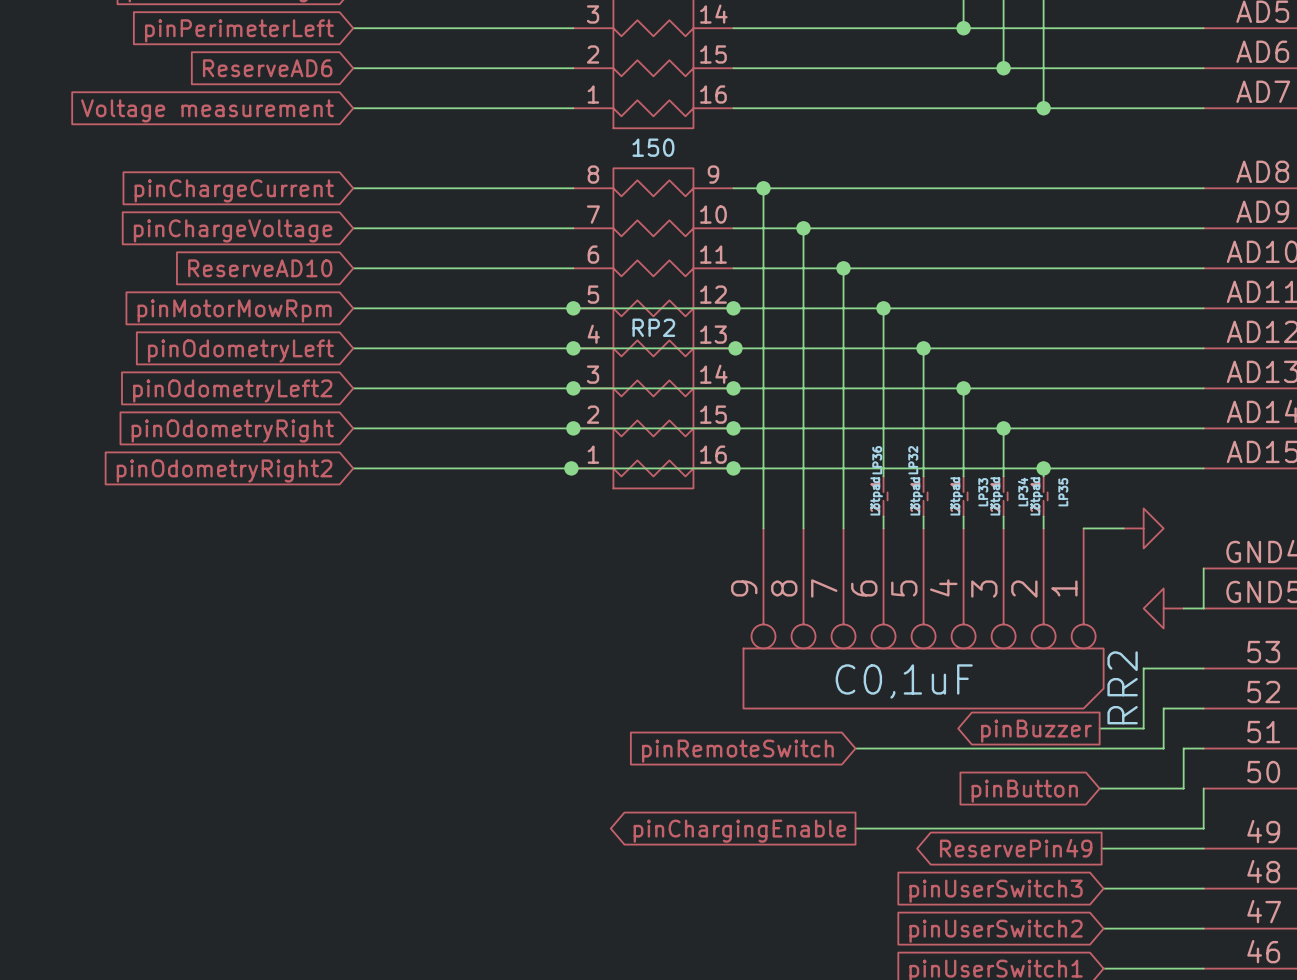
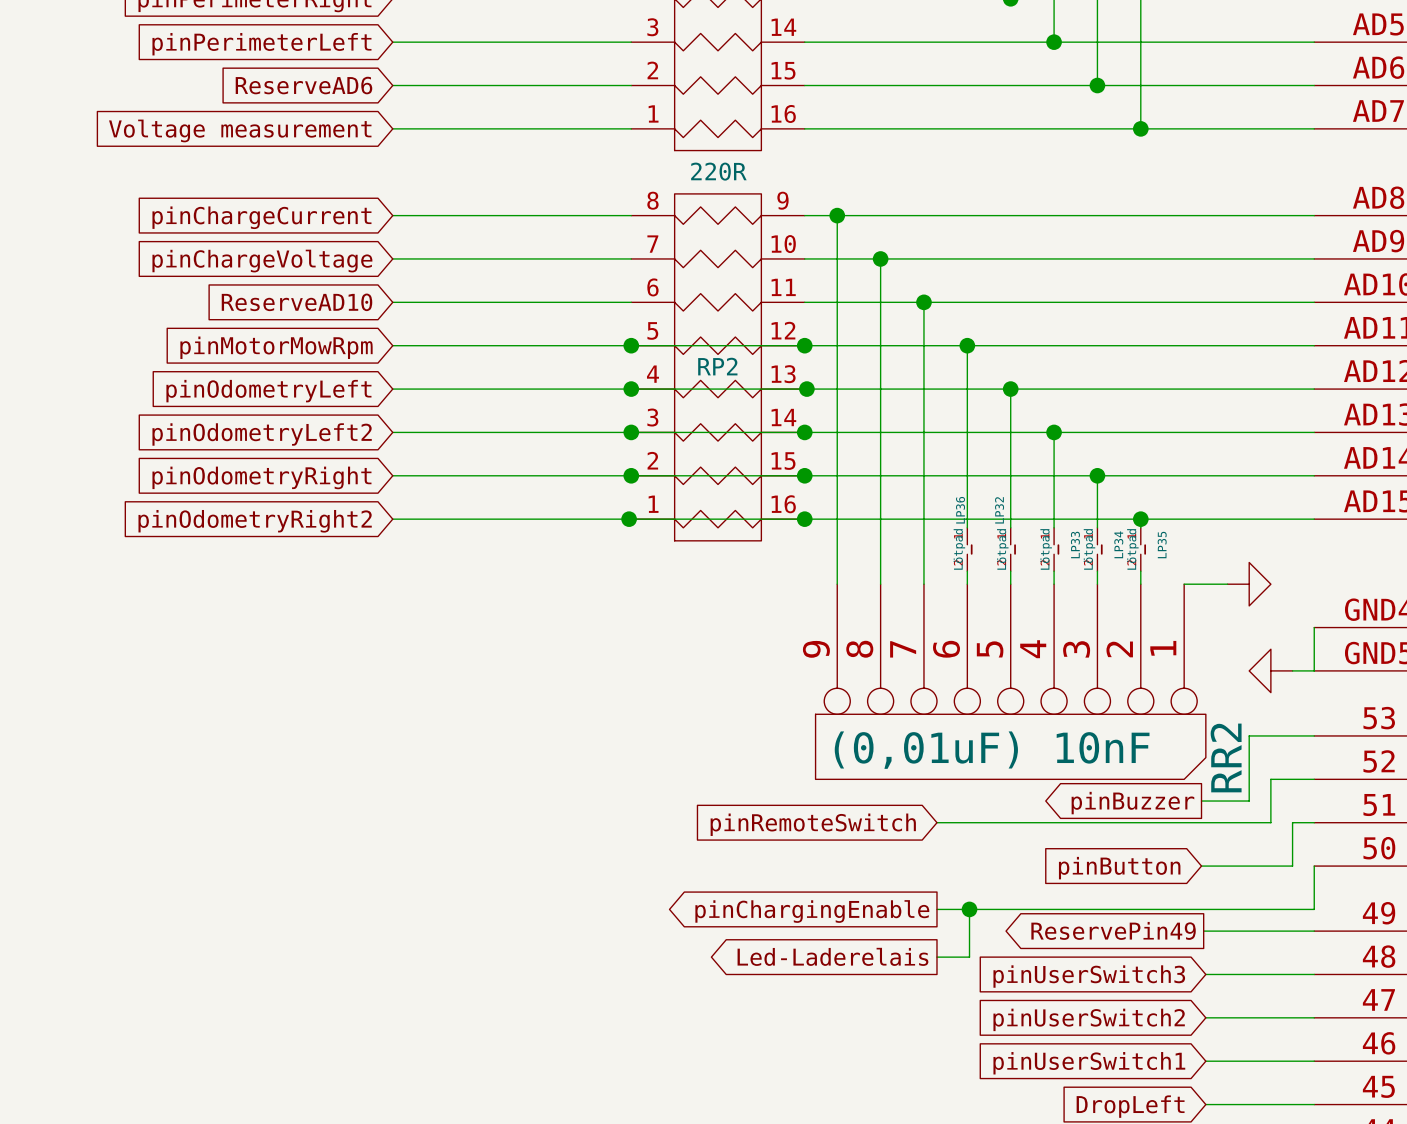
RP2 value: 150 (653, 147) -> 220R (718, 171)
RR2 value: C0,1uF (904, 681) -> (0,01uF) 10nF (992, 750)
wire: none -> (969, 909) (969, 957) (936, 957)
junction: none -> (969, 909)
global label: none -> Led-Laderelais (832, 956)

